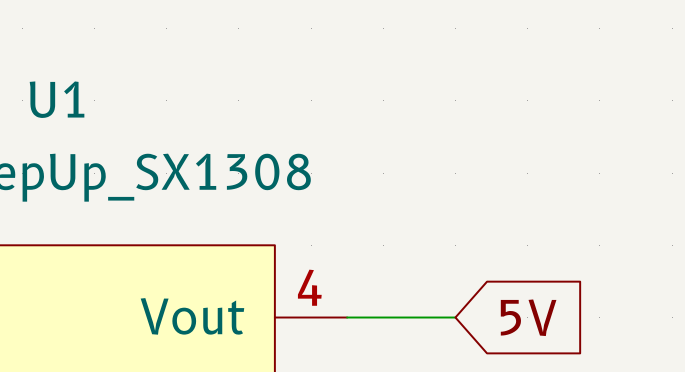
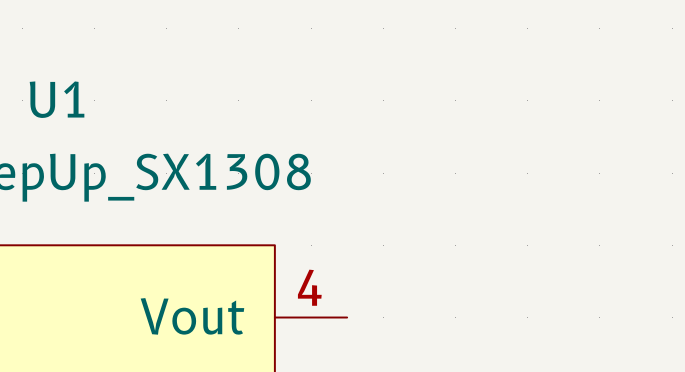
wire: (347, 317) (455, 317) -> none
global label: 5V (528, 317) -> none

